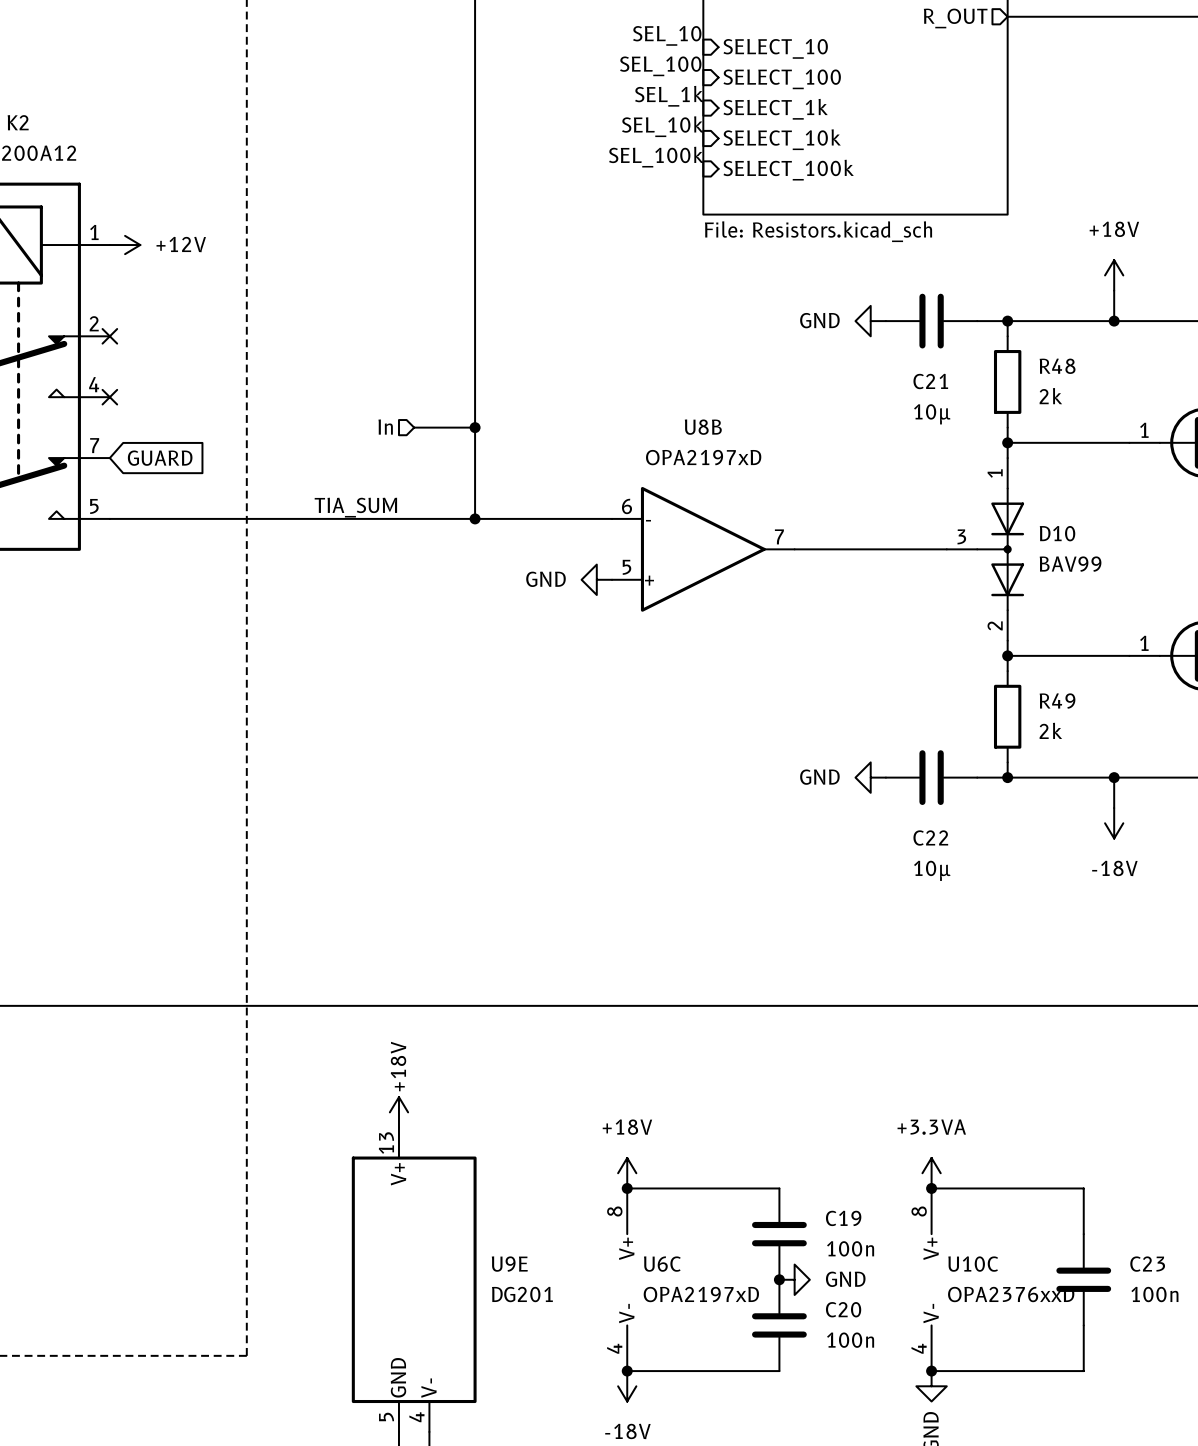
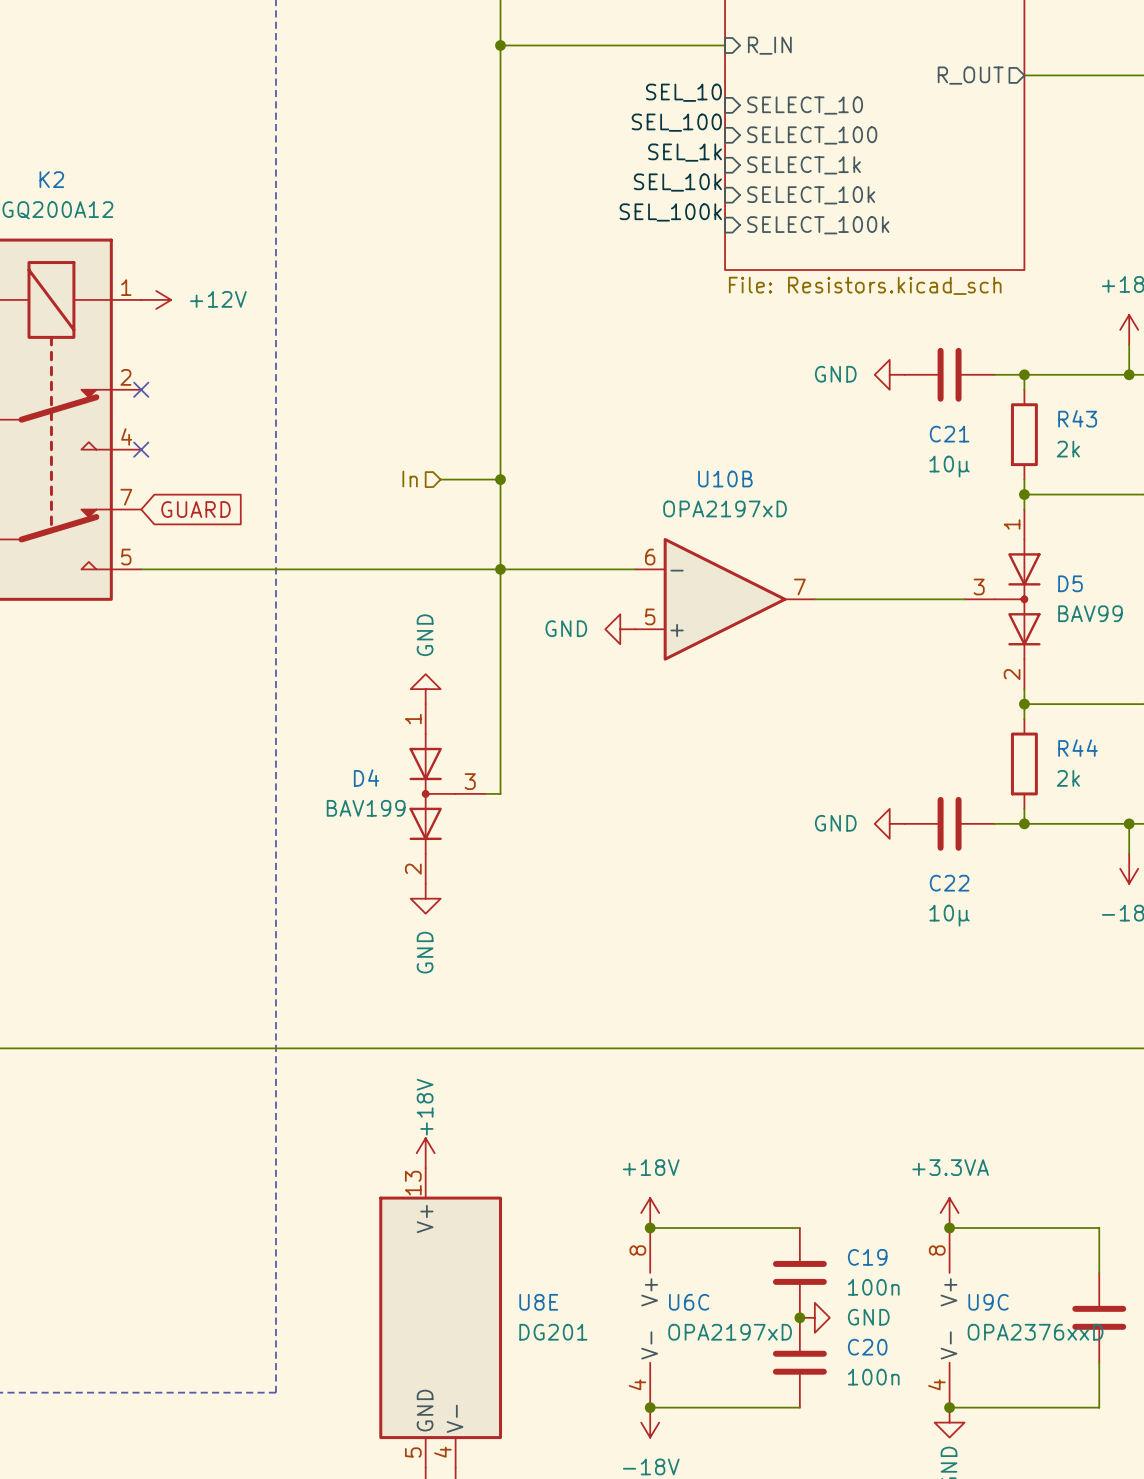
R48 name: R48 (1057, 366) -> R43 (1077, 418)
U8B name: U8B (703, 427) -> U10B (725, 479)
label: TIA_SUM (355, 507) -> none
wire: none -> (500, 569) (500, 793) (485, 793)
D10 name: D10 (1057, 533) -> D5 (1070, 583)
power symbol: none -> GND (425, 689)
R49 name: R49 (1057, 701) -> R44 (1077, 748)
D4: none -> BAV199 (447, 793)
power symbol: none -> GND (425, 898)
U9E name: U9E (509, 1264) -> U8E (538, 1302)
U10C name: U10C (973, 1264) -> U9C (988, 1302)

